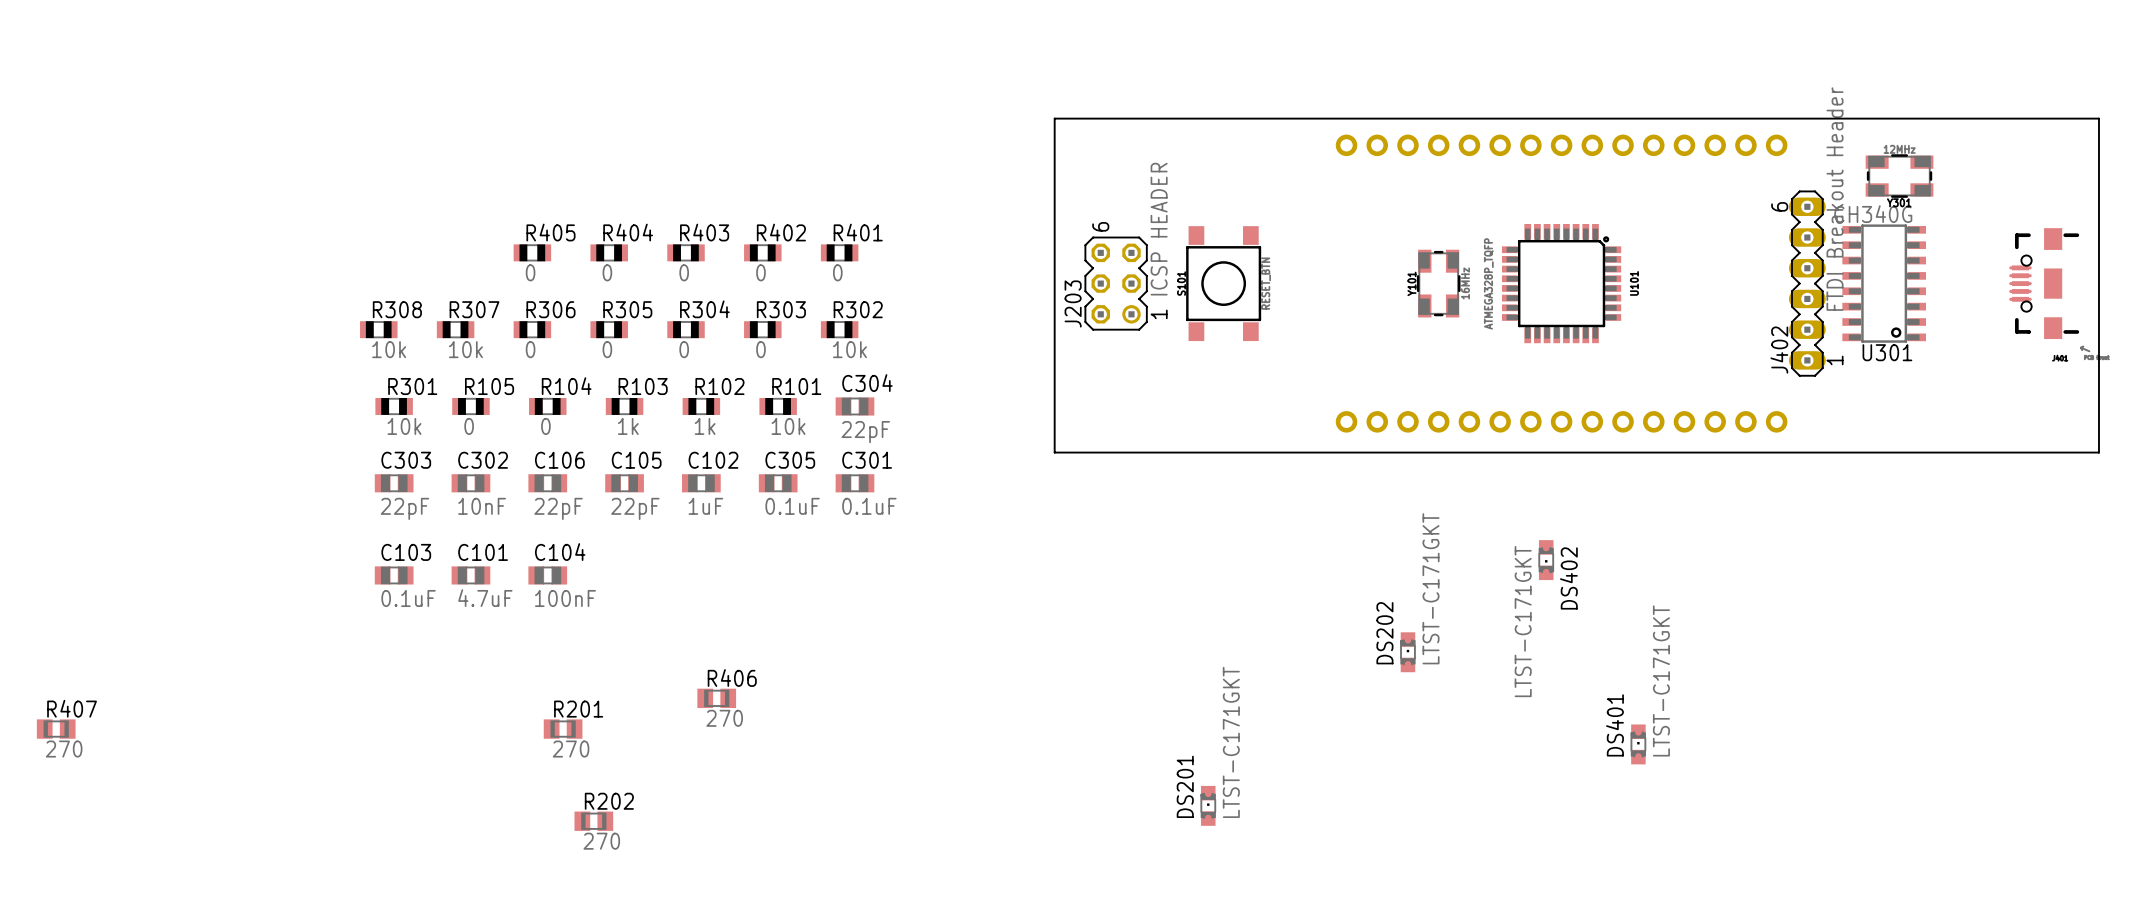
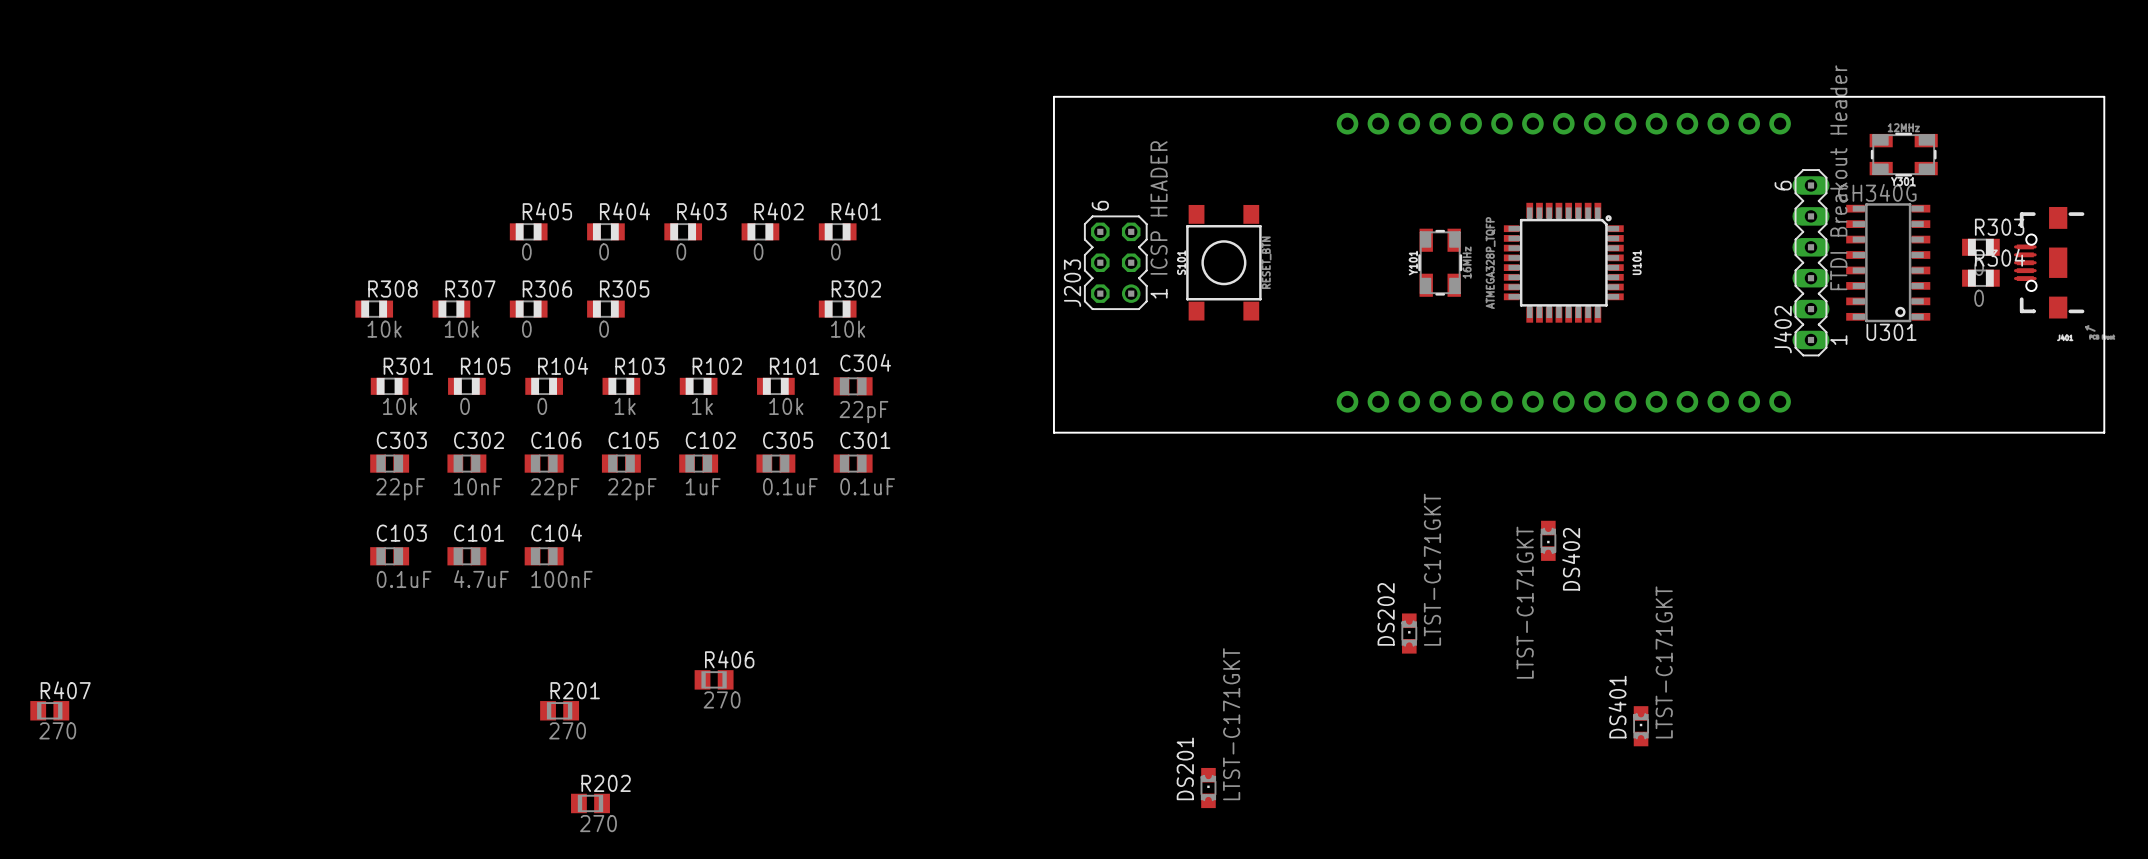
R304 position: (686, 329) -> (1980, 278)
R303 position: (762, 329) -> (1980, 247)

